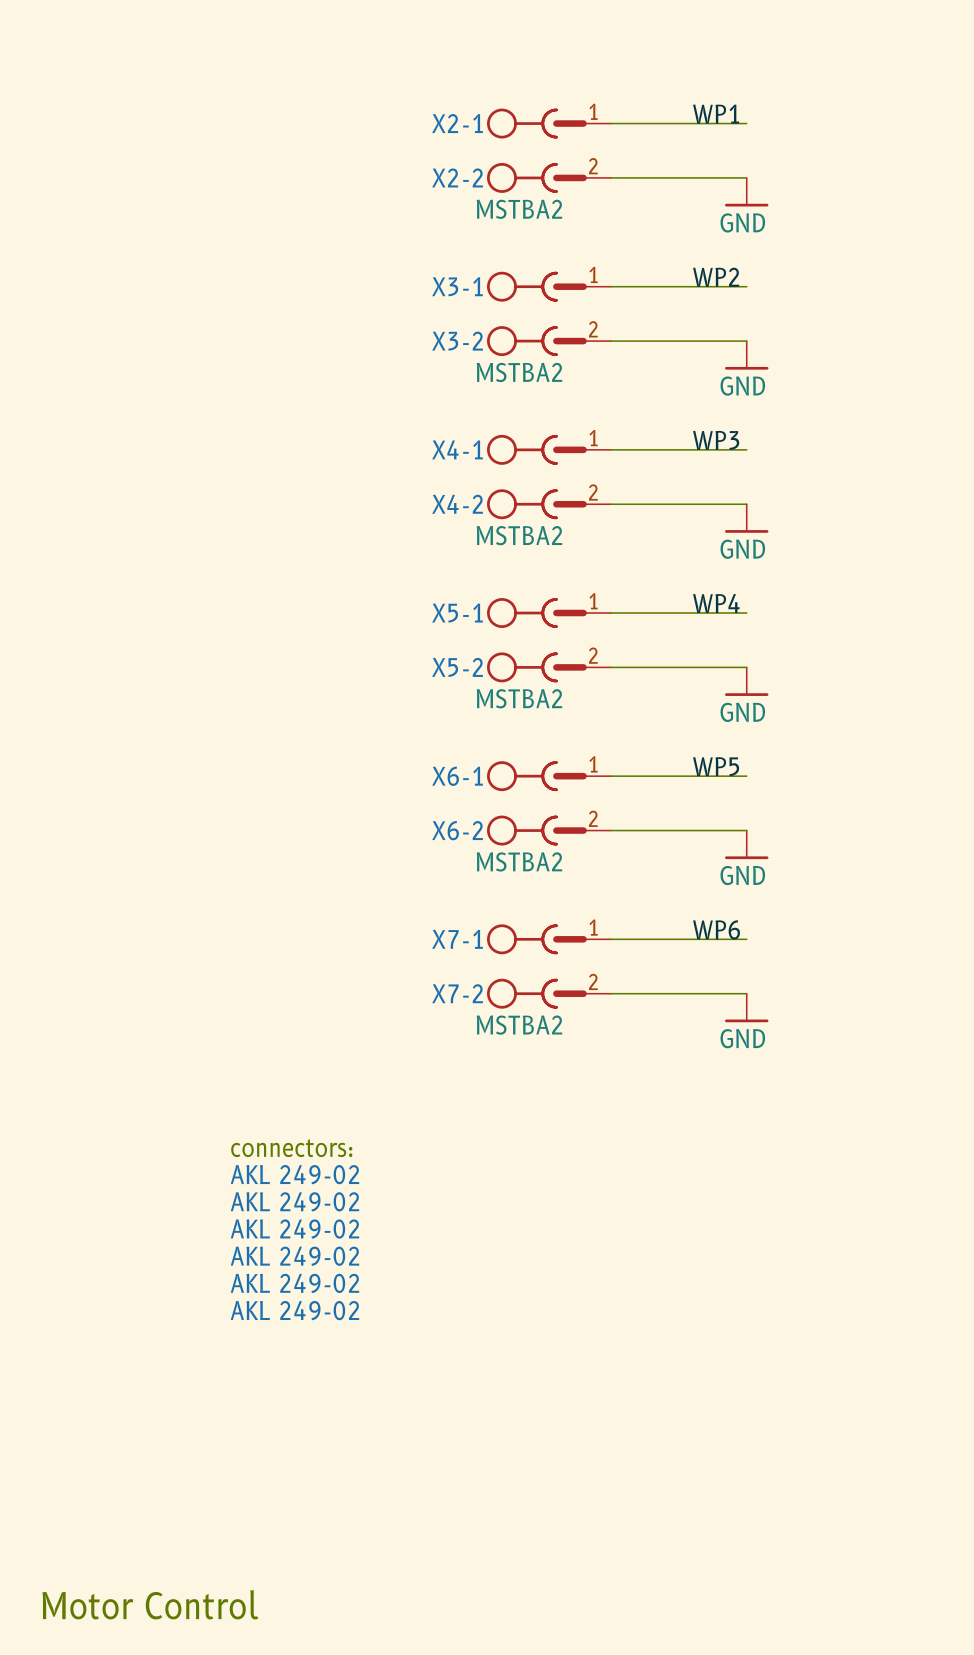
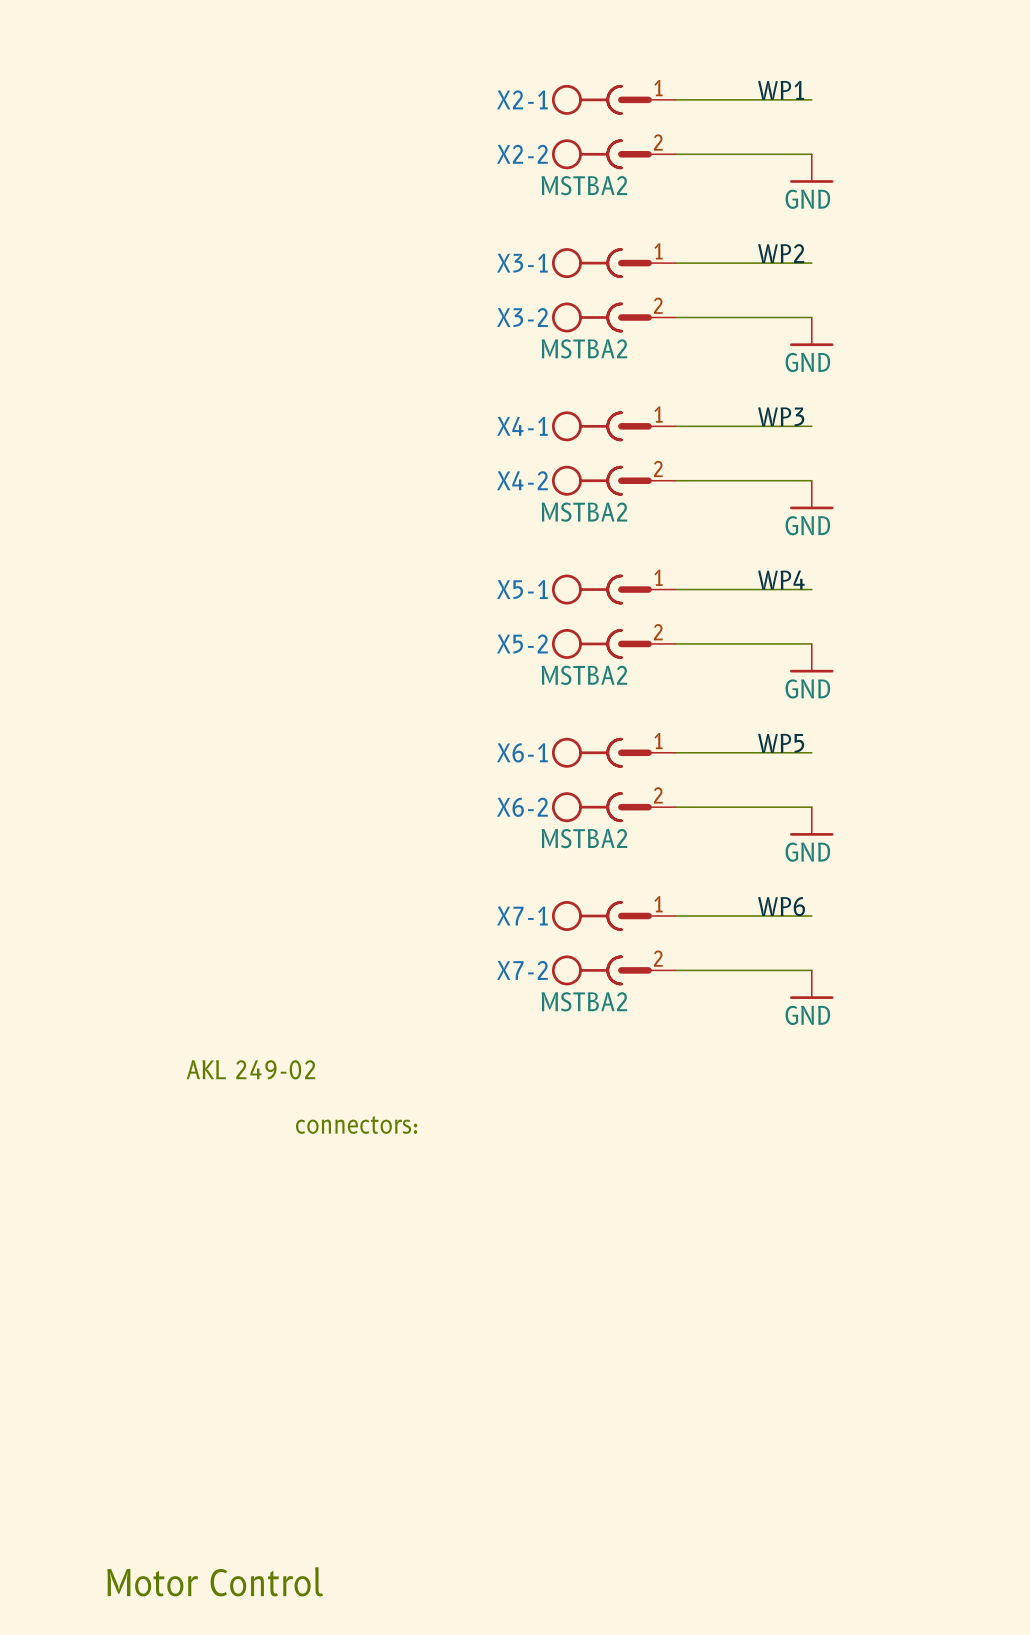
text: none -> AKL 249-02 (251, 1069)
part: AKL 249-02 (294, 1174) -> none
part: AKL 249-02 (294, 1201) -> none
part: AKL 249-02 (294, 1229) -> none
part: AKL 249-02 (294, 1256) -> none
part: AKL 249-02 (294, 1283) -> none
part: AKL 249-02 (294, 1310) -> none

